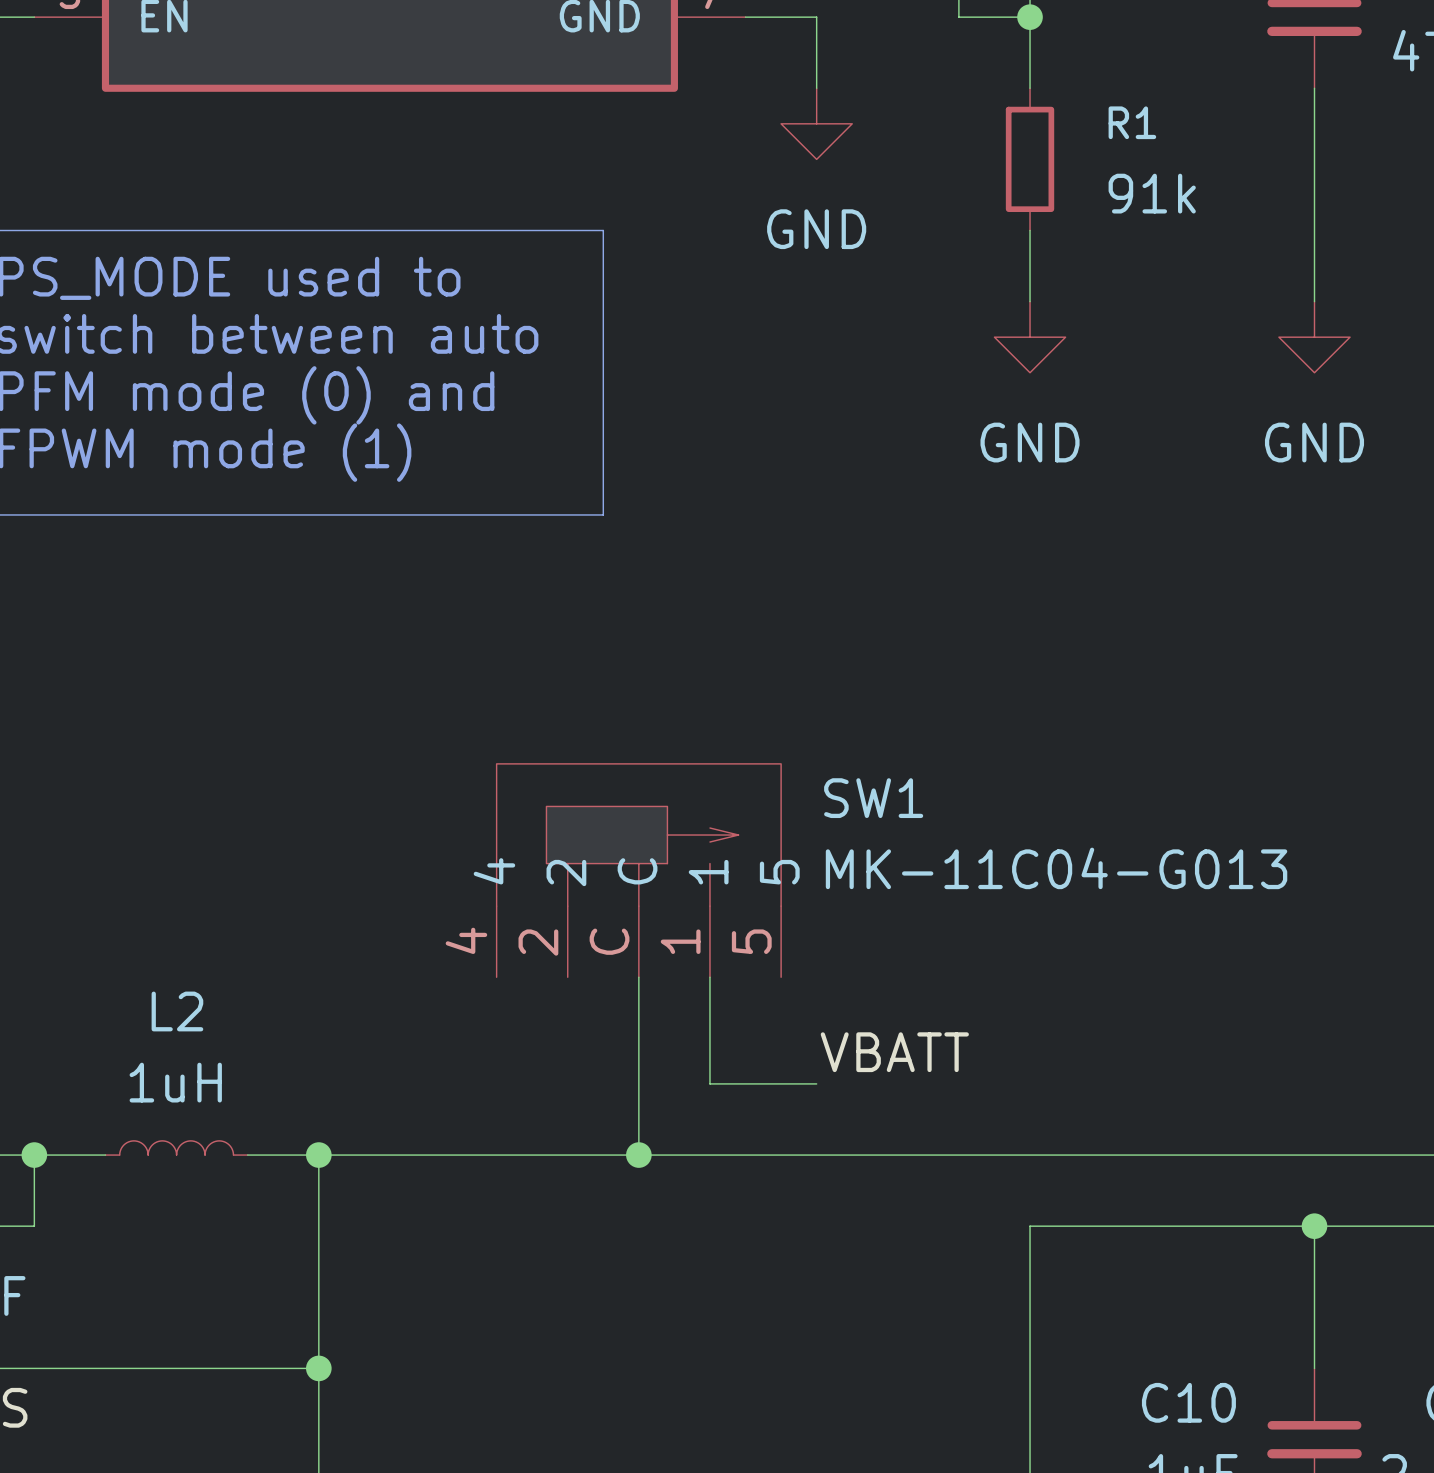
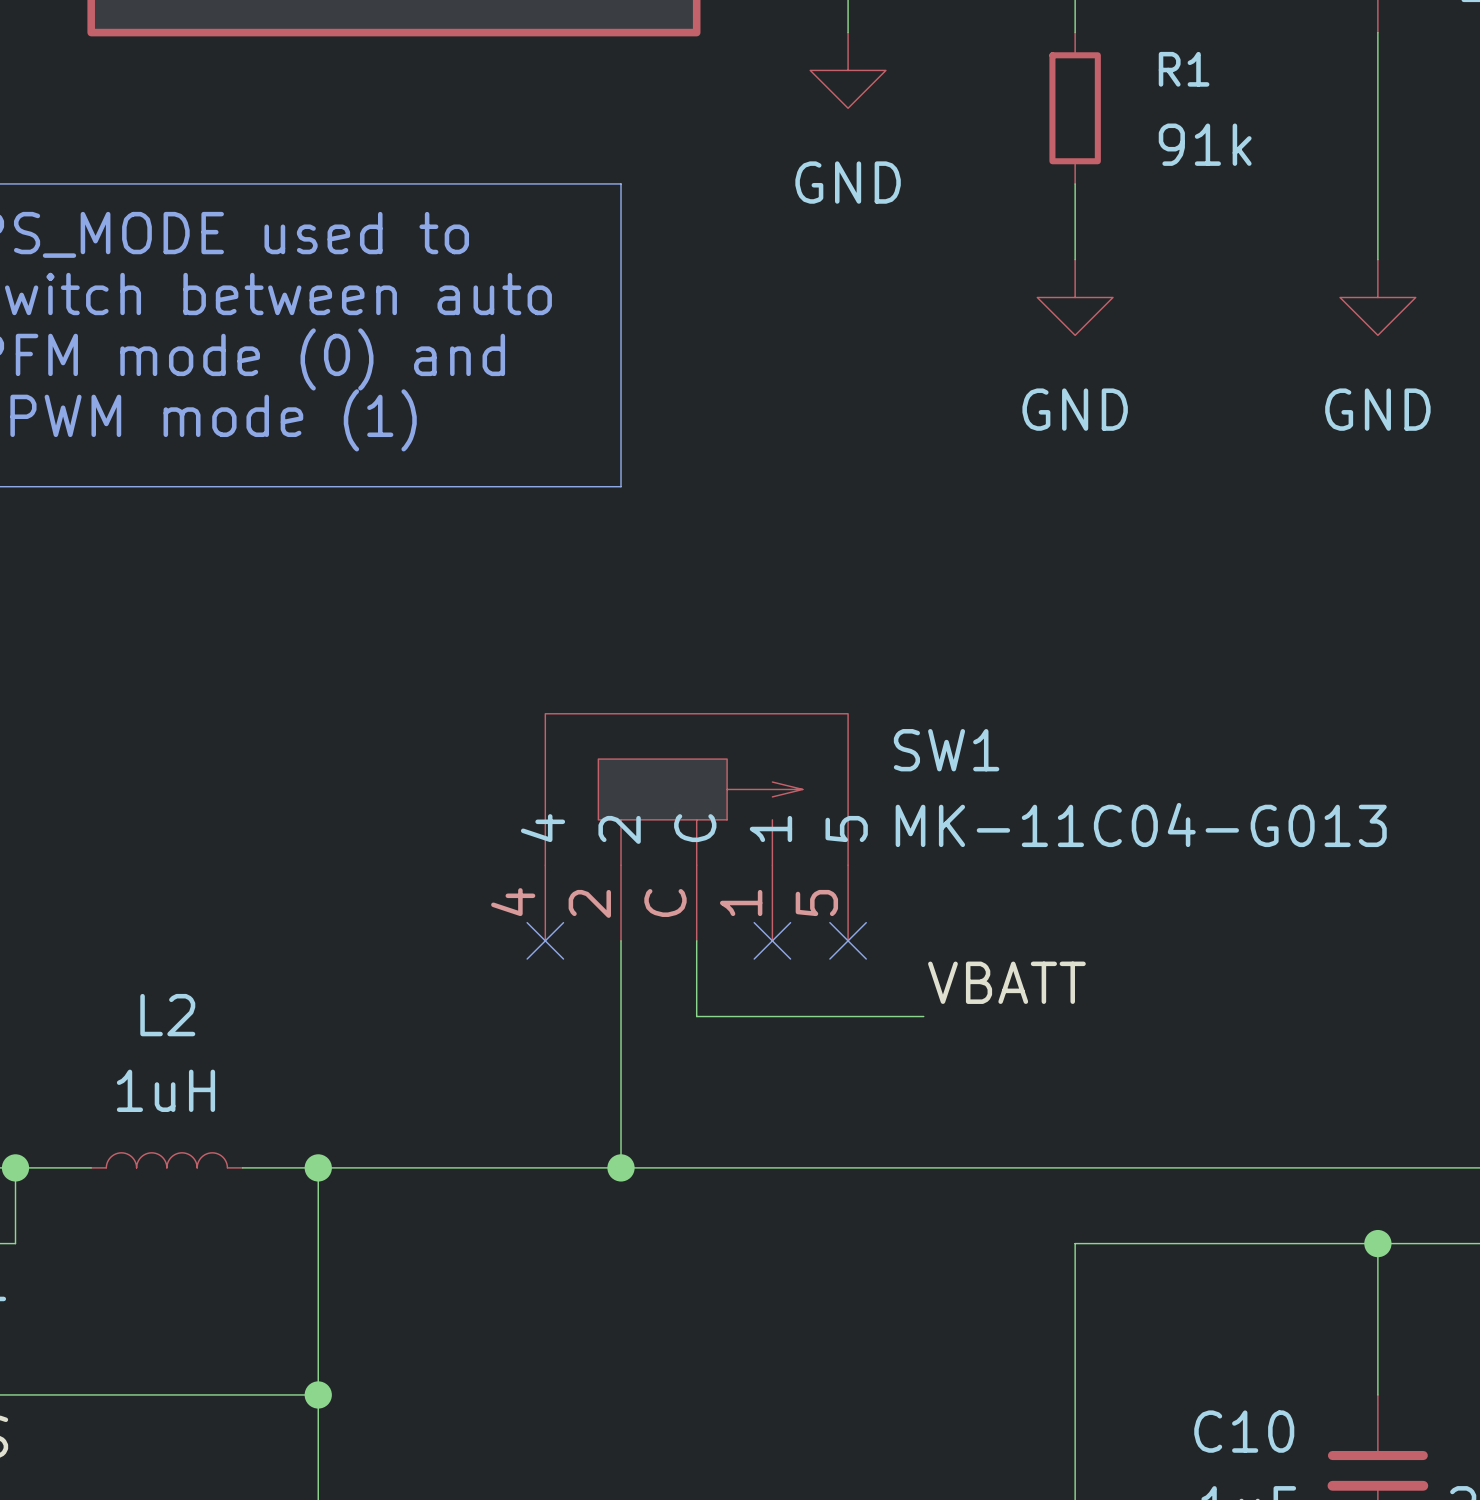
SW1 position: (638, 870) -> (696, 827)
no-connect mark: none -> (545, 940)
wire: none -> (621, 940) (621, 1167)
wire: none -> (696, 940) (696, 1016) (923, 1016)
no-connect mark: none -> (772, 940)
no-connect mark: none -> (848, 940)
wire: (638, 977) (638, 1155) -> none
wire: (709, 977) (709, 1083) (816, 1083) -> none
label position: VBATT (894, 1052) -> VBATT (1006, 982)
junction position: (638, 1155) -> (621, 1167)

